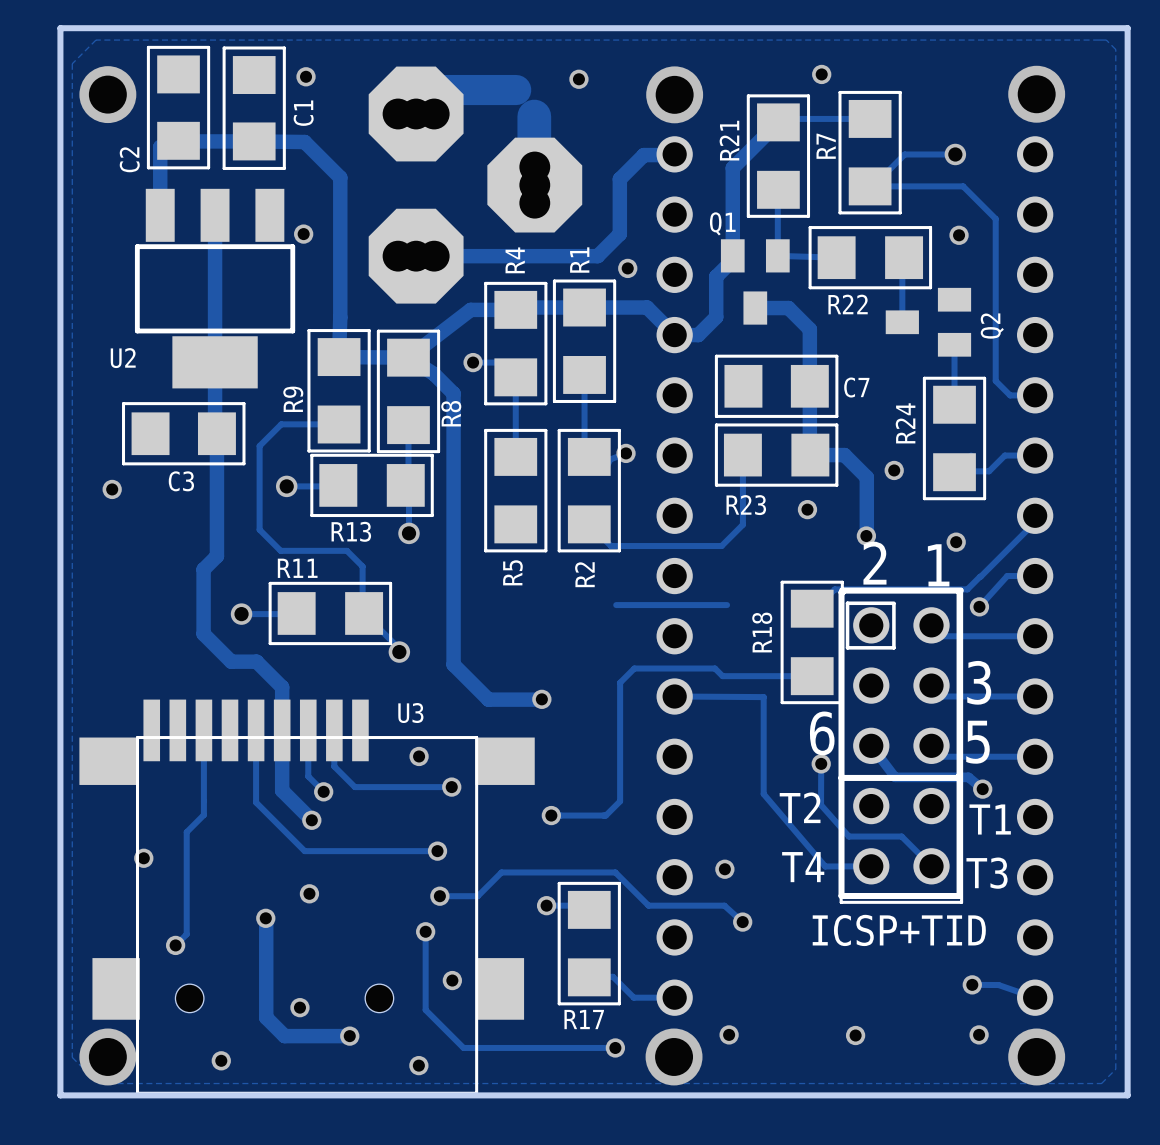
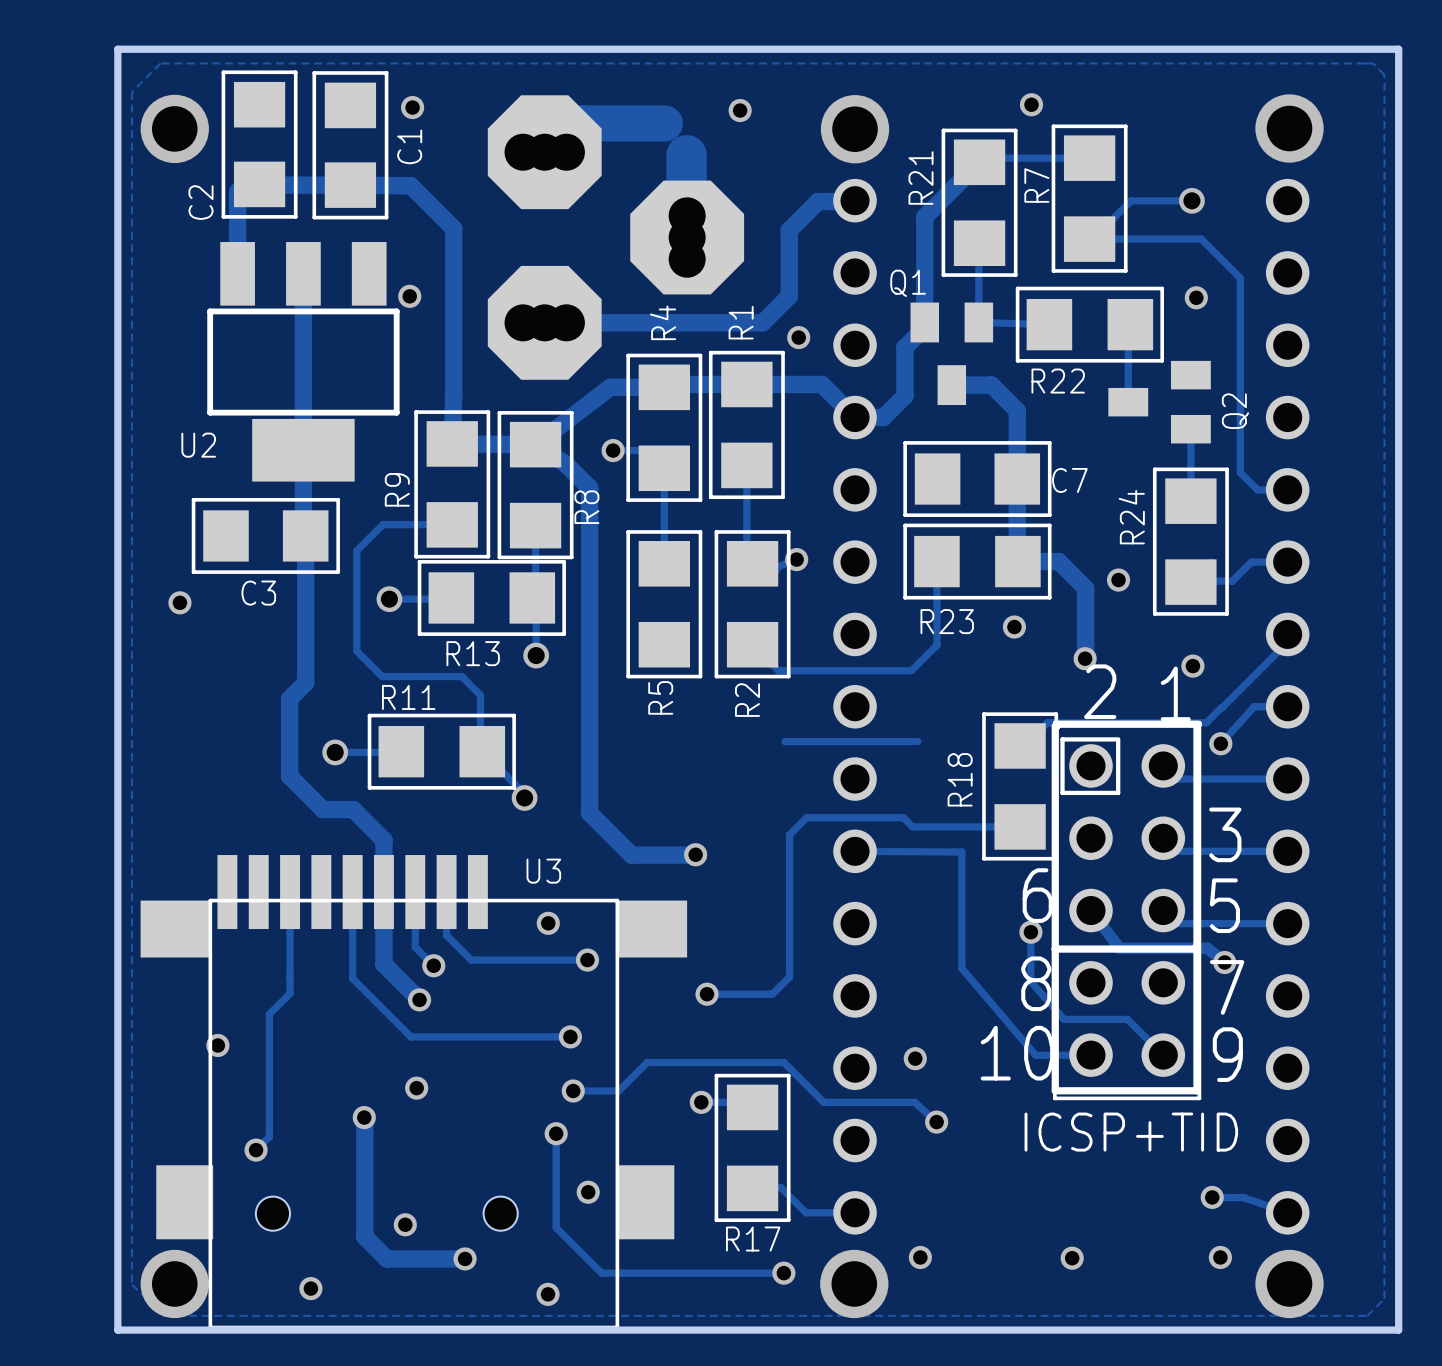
text: none -> 8 (1036, 983)
text: T2 (800, 807) -> none
text: T1 (990, 819) -> 7 (1227, 987)
text: T4 (803, 867) -> 10 (1017, 1053)
text: T3 (987, 873) -> 9 (1227, 1054)

